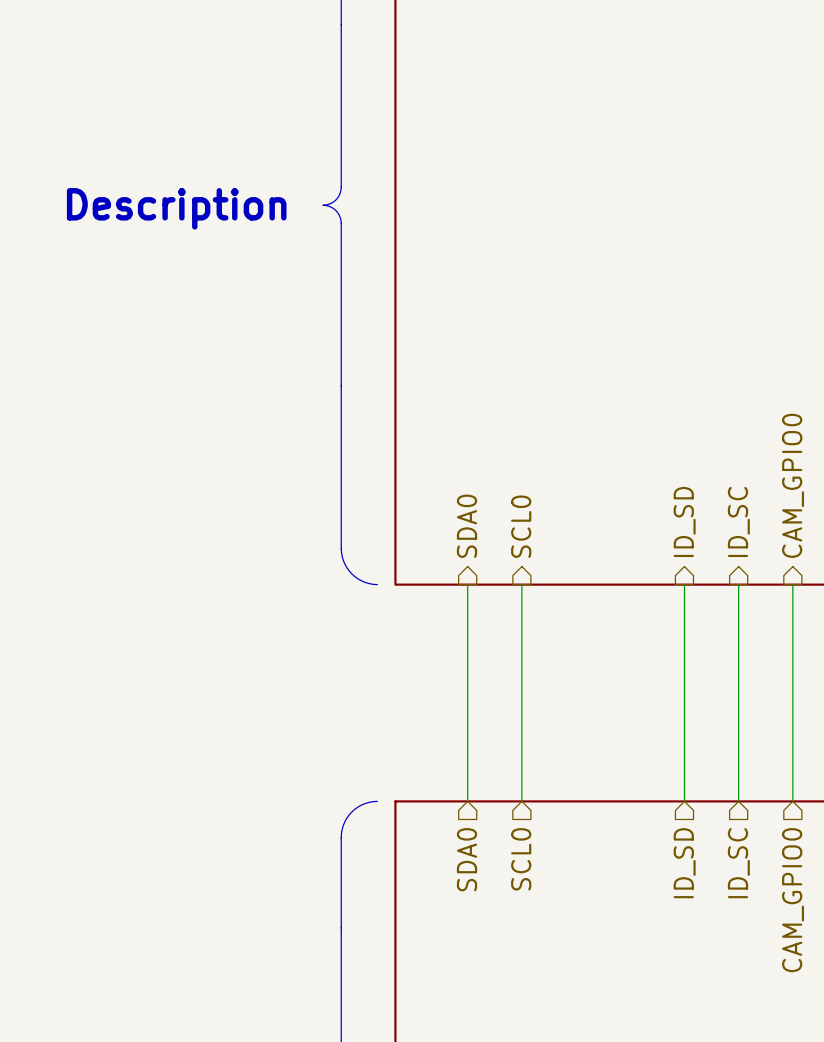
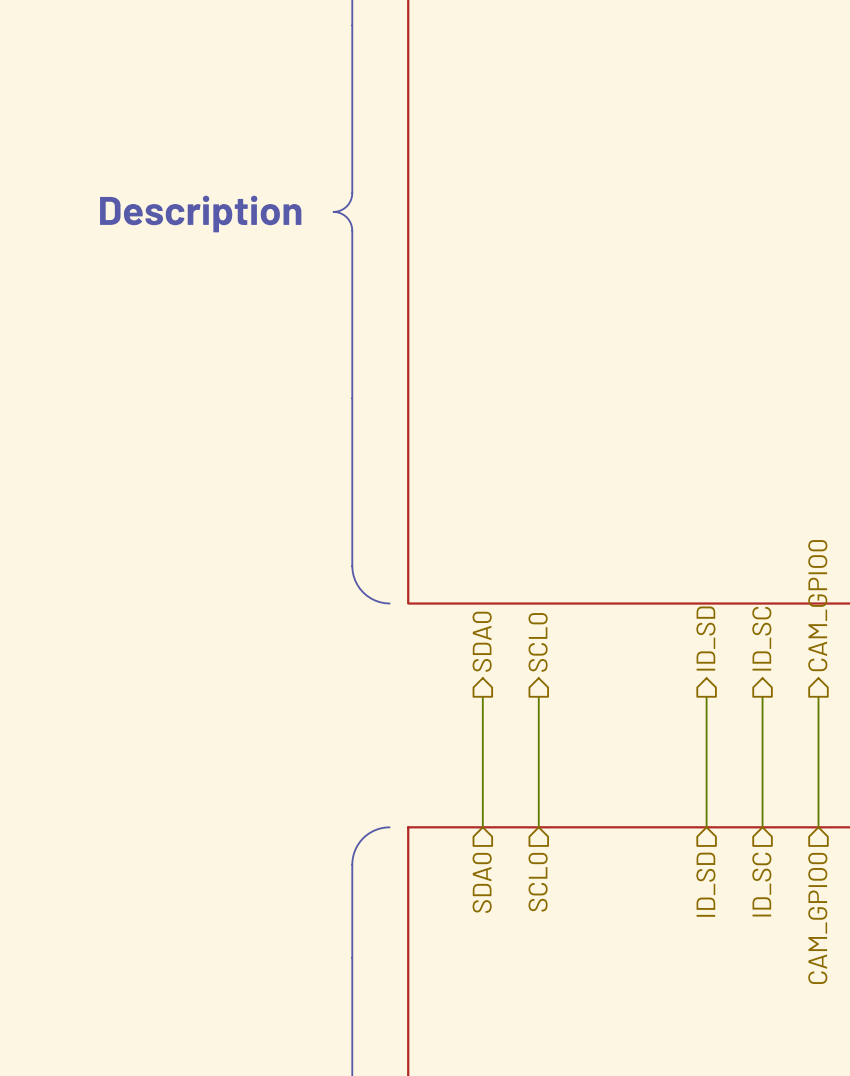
hierarchical label position: CAM_GPIO0 (793, 485) -> CAM_GPIO0 (817, 605)
hierarchical label position: ID_SD (684, 521) -> ID_SD (705, 638)
hierarchical label position: ID_SC (738, 521) -> ID_SC (761, 638)
hierarchical label position: SDA0 (467, 526) -> SDA0 (482, 641)
hierarchical label position: SCL0 (521, 526) -> SCL0 (538, 642)
wire: (467, 584) (467, 674) -> none
wire: (521, 584) (521, 674) -> none
wire: (684, 584) (684, 674) -> none
wire: (738, 584) (738, 674) -> none
wire: (792, 584) (792, 674) -> none

